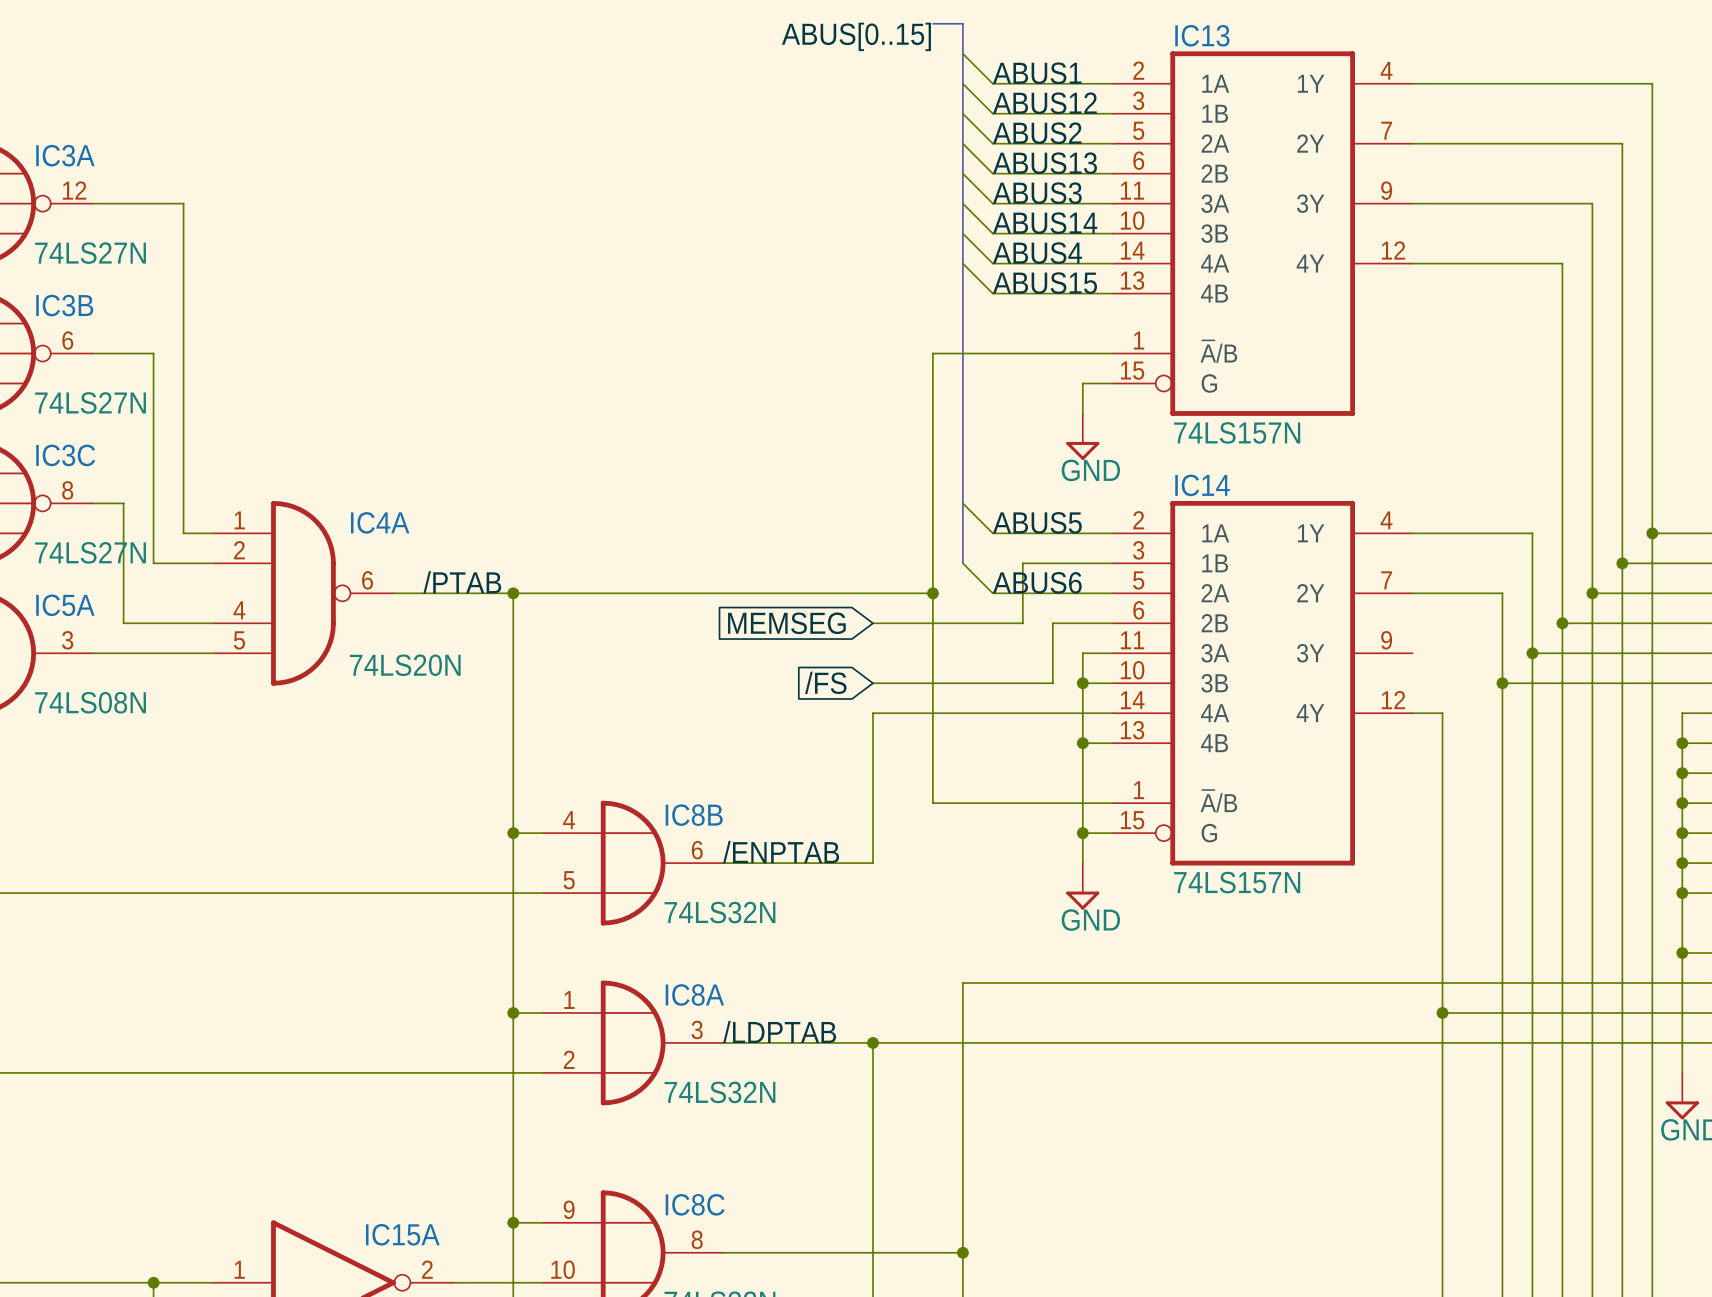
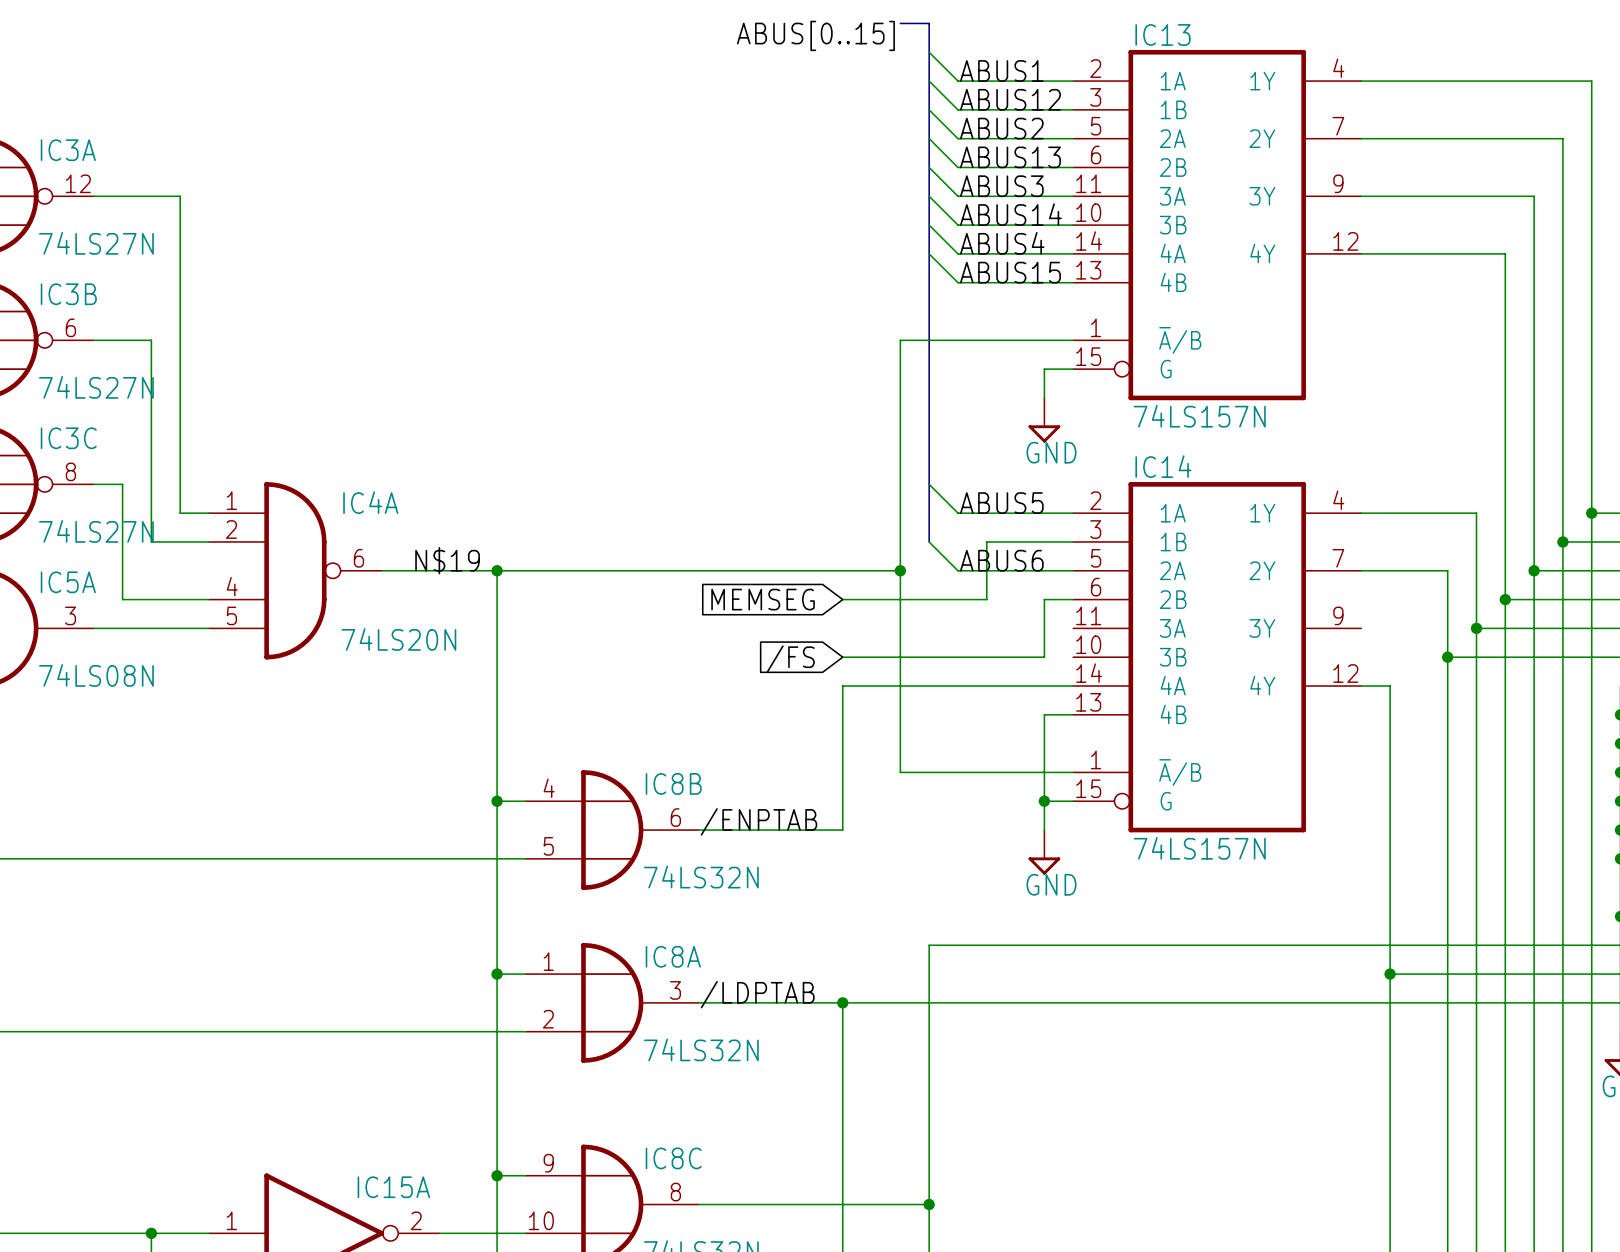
label: /PTAB (462, 582) -> N$19 (447, 560)
wire: (1082, 623) (1052, 623) (1052, 683) -> (1044, 599) (1044, 628)
wire: (1082, 653) (1112, 653) -> (1015, 657) (1044, 657)
junction: (1082, 683) -> none
wire: (1112, 683) (1082, 683) (1082, 743) -> none
junction: (1082, 743) -> none

